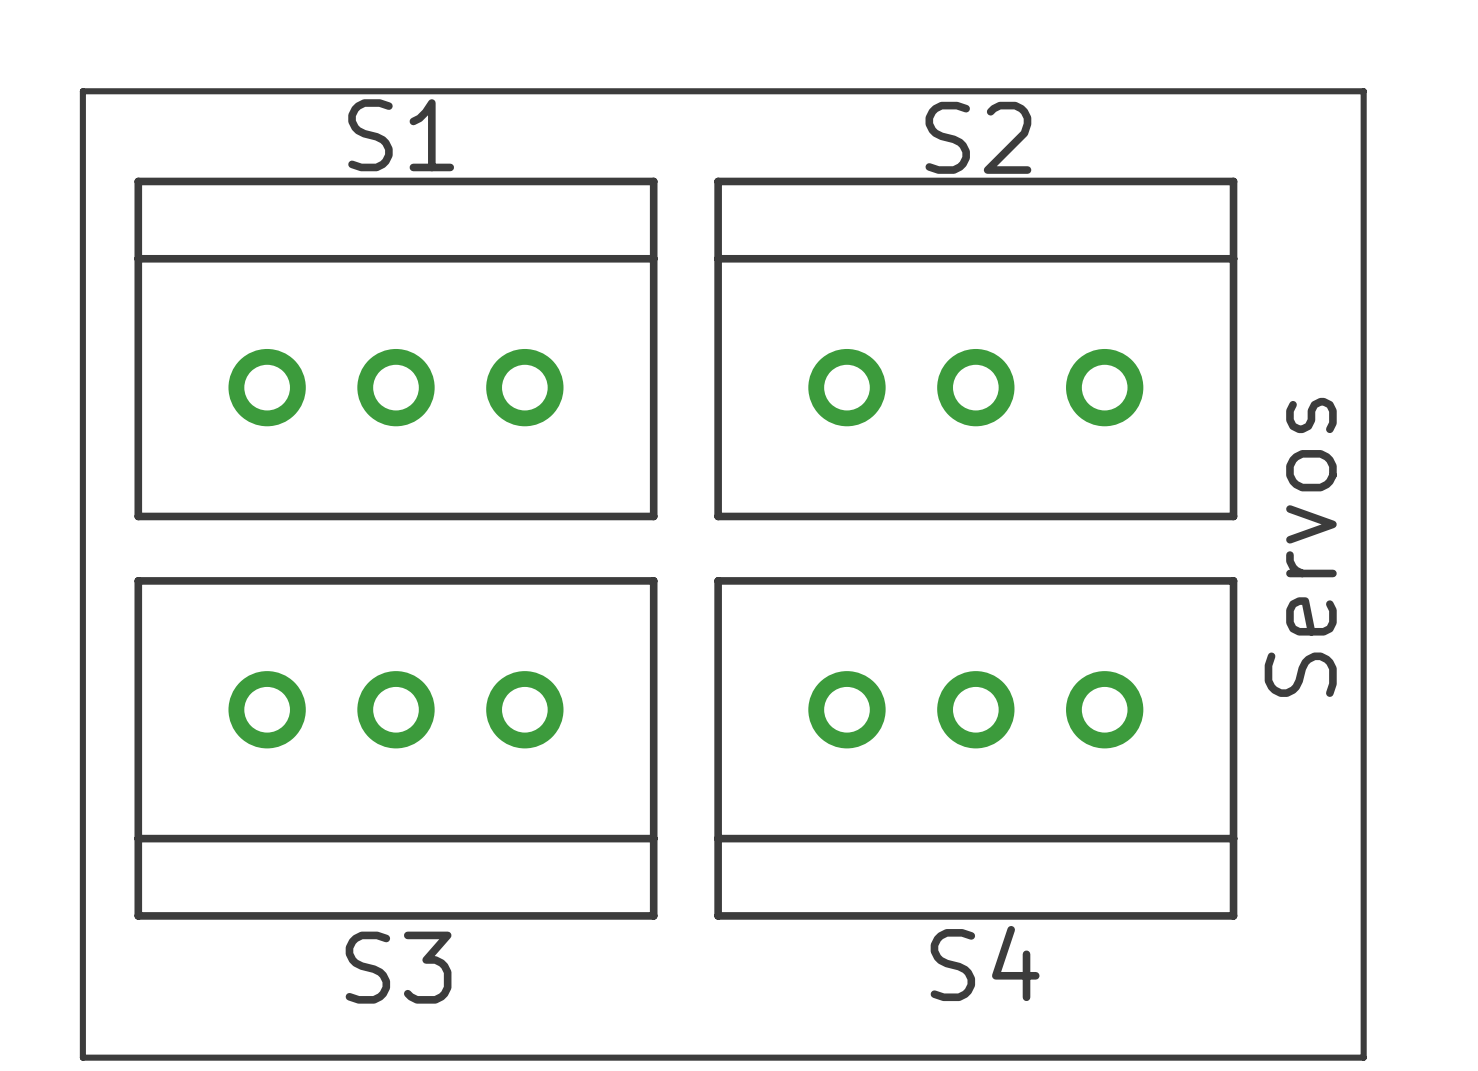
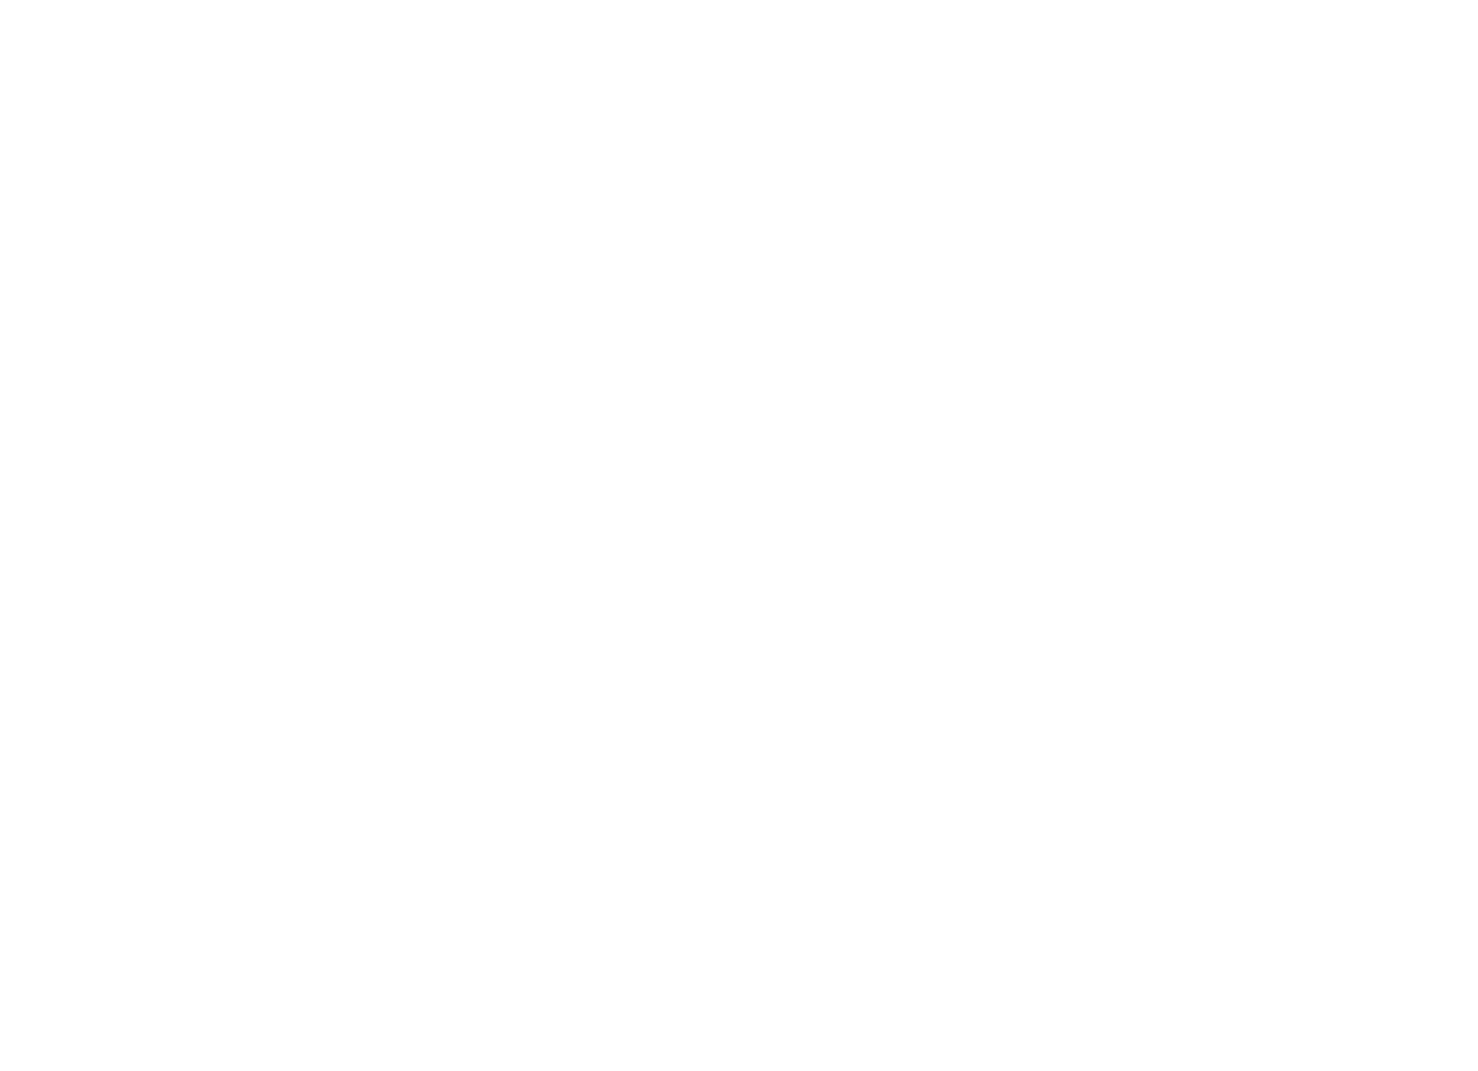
line: (82, 91) (1363, 91) (1363, 1057) (82, 1057) (82, 91) -> none
text: S1 (401, 135) -> none
text: S2 (978, 137) -> none
part: (395, 348) -> none
part: (975, 348) -> none
text: Servos (1300, 547) -> none
part: (395, 748) -> none
part: (975, 748) -> none
text: S4 (985, 963) -> none
text: S3 (398, 967) -> none

